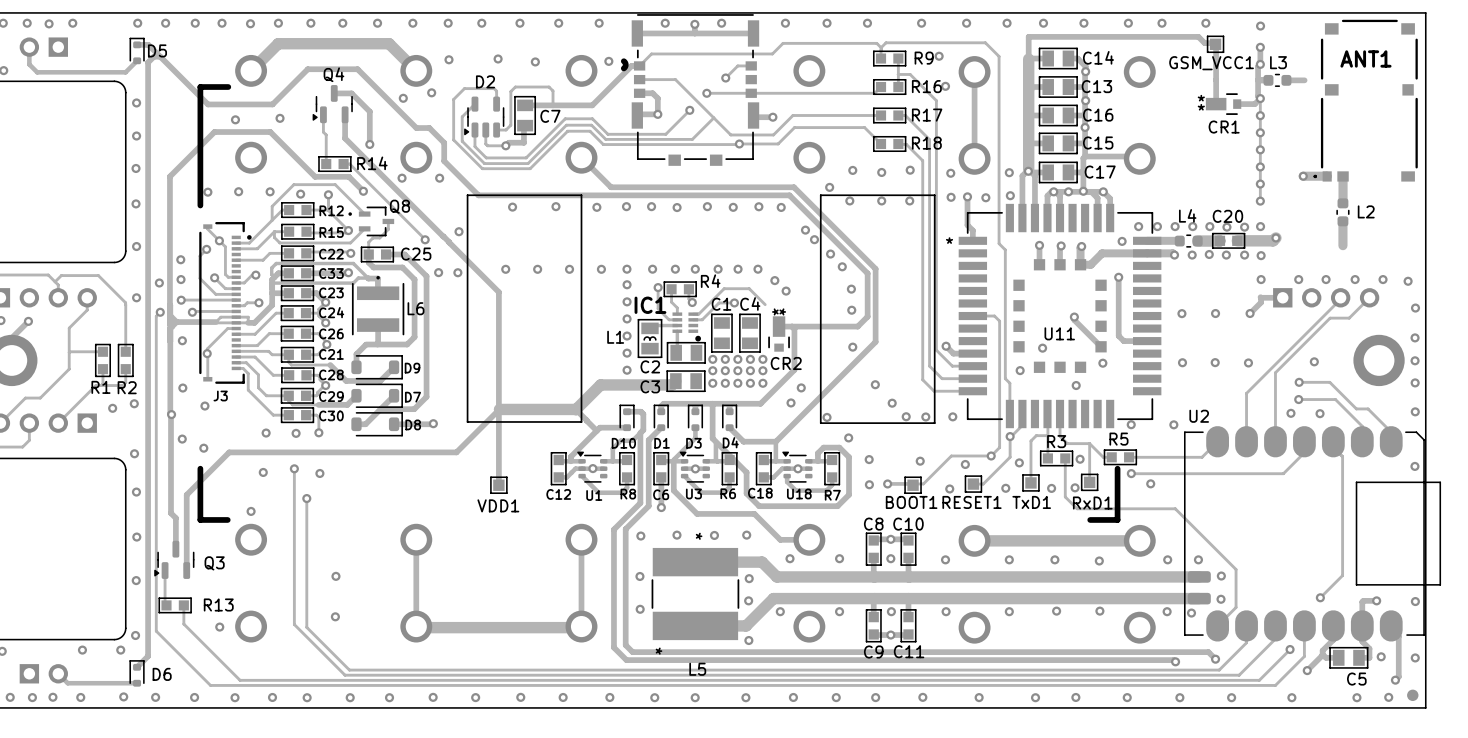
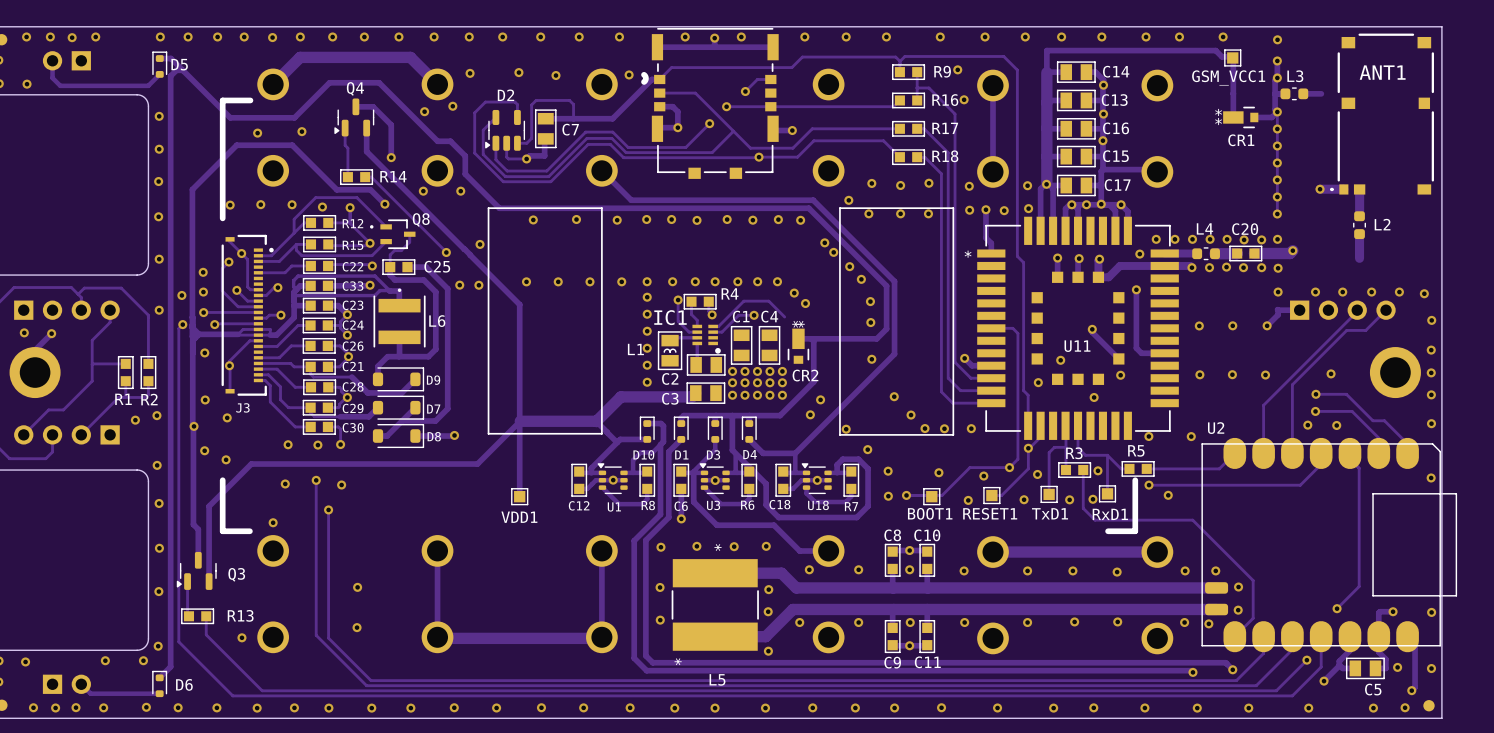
U2 footprint: [1184, 426, 1442, 642] -> [1201, 437, 1458, 653]

